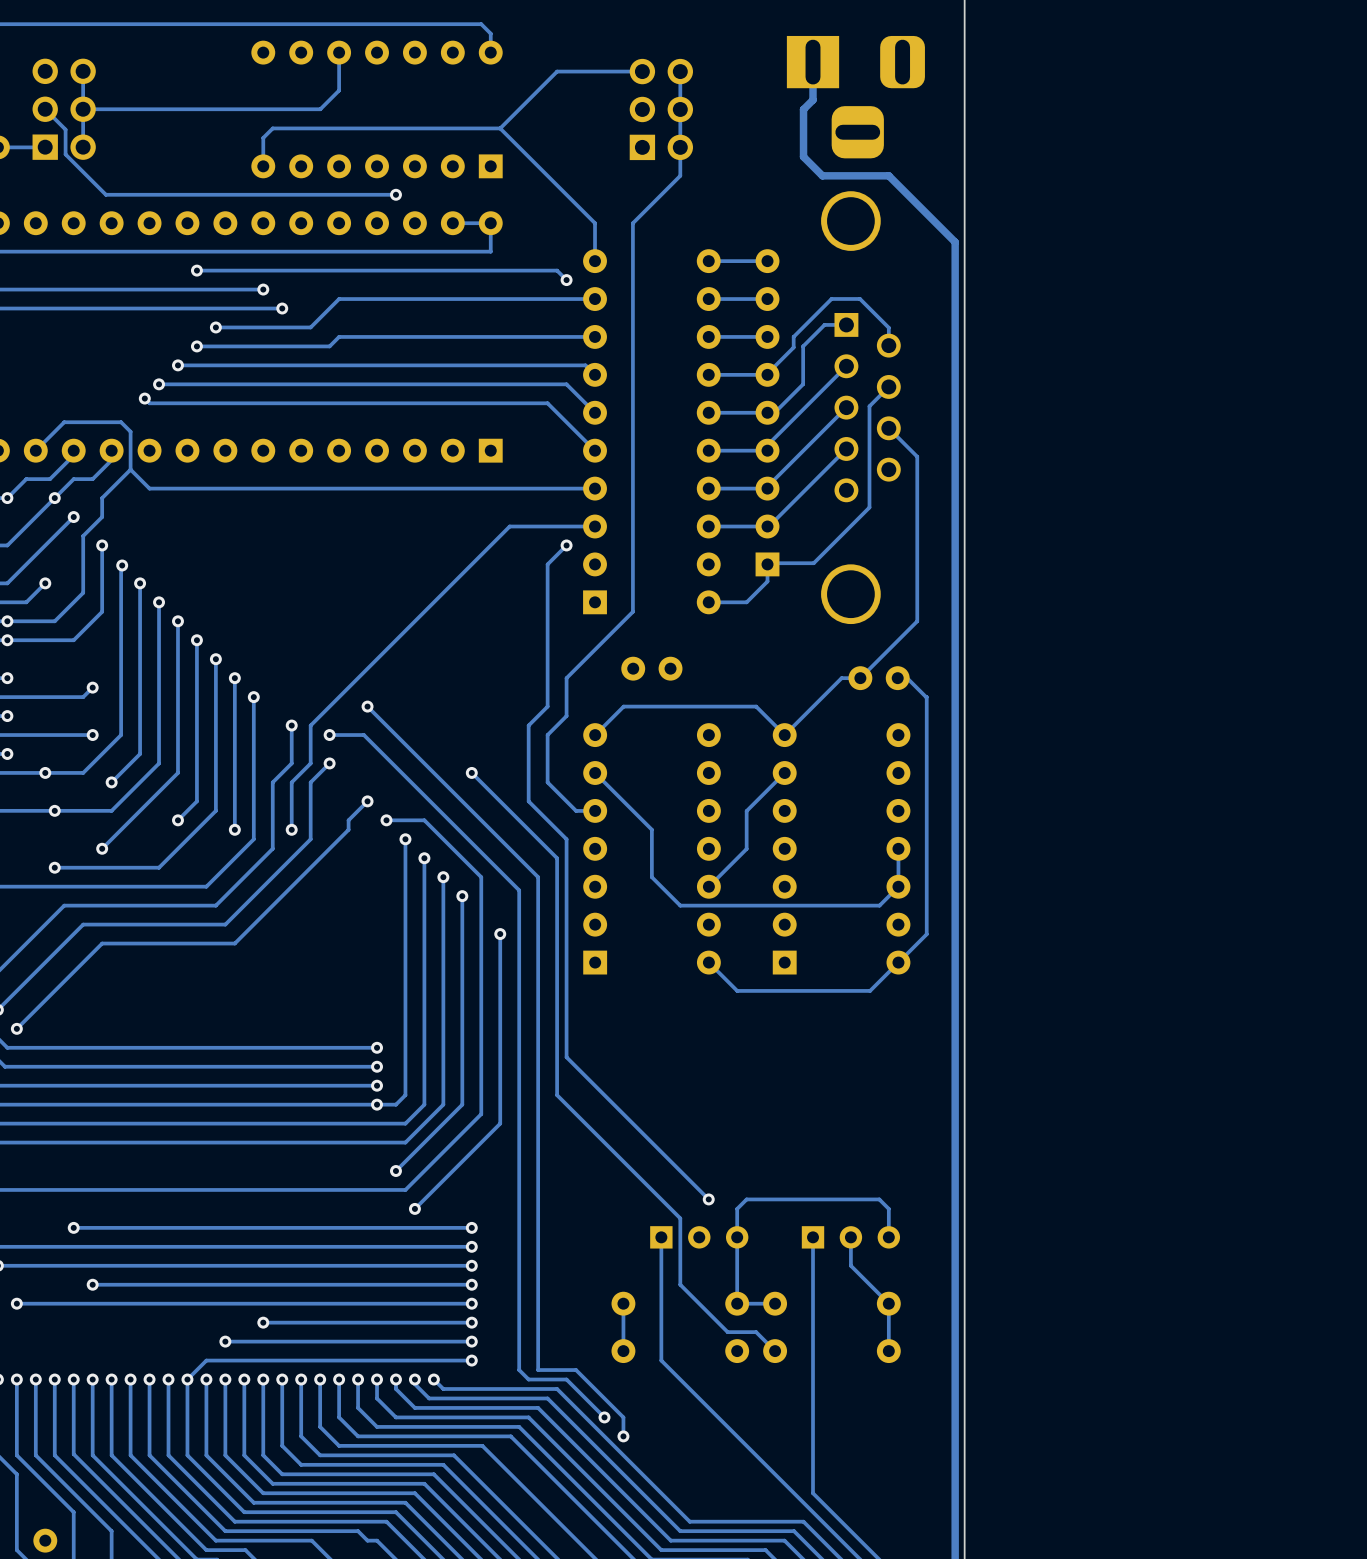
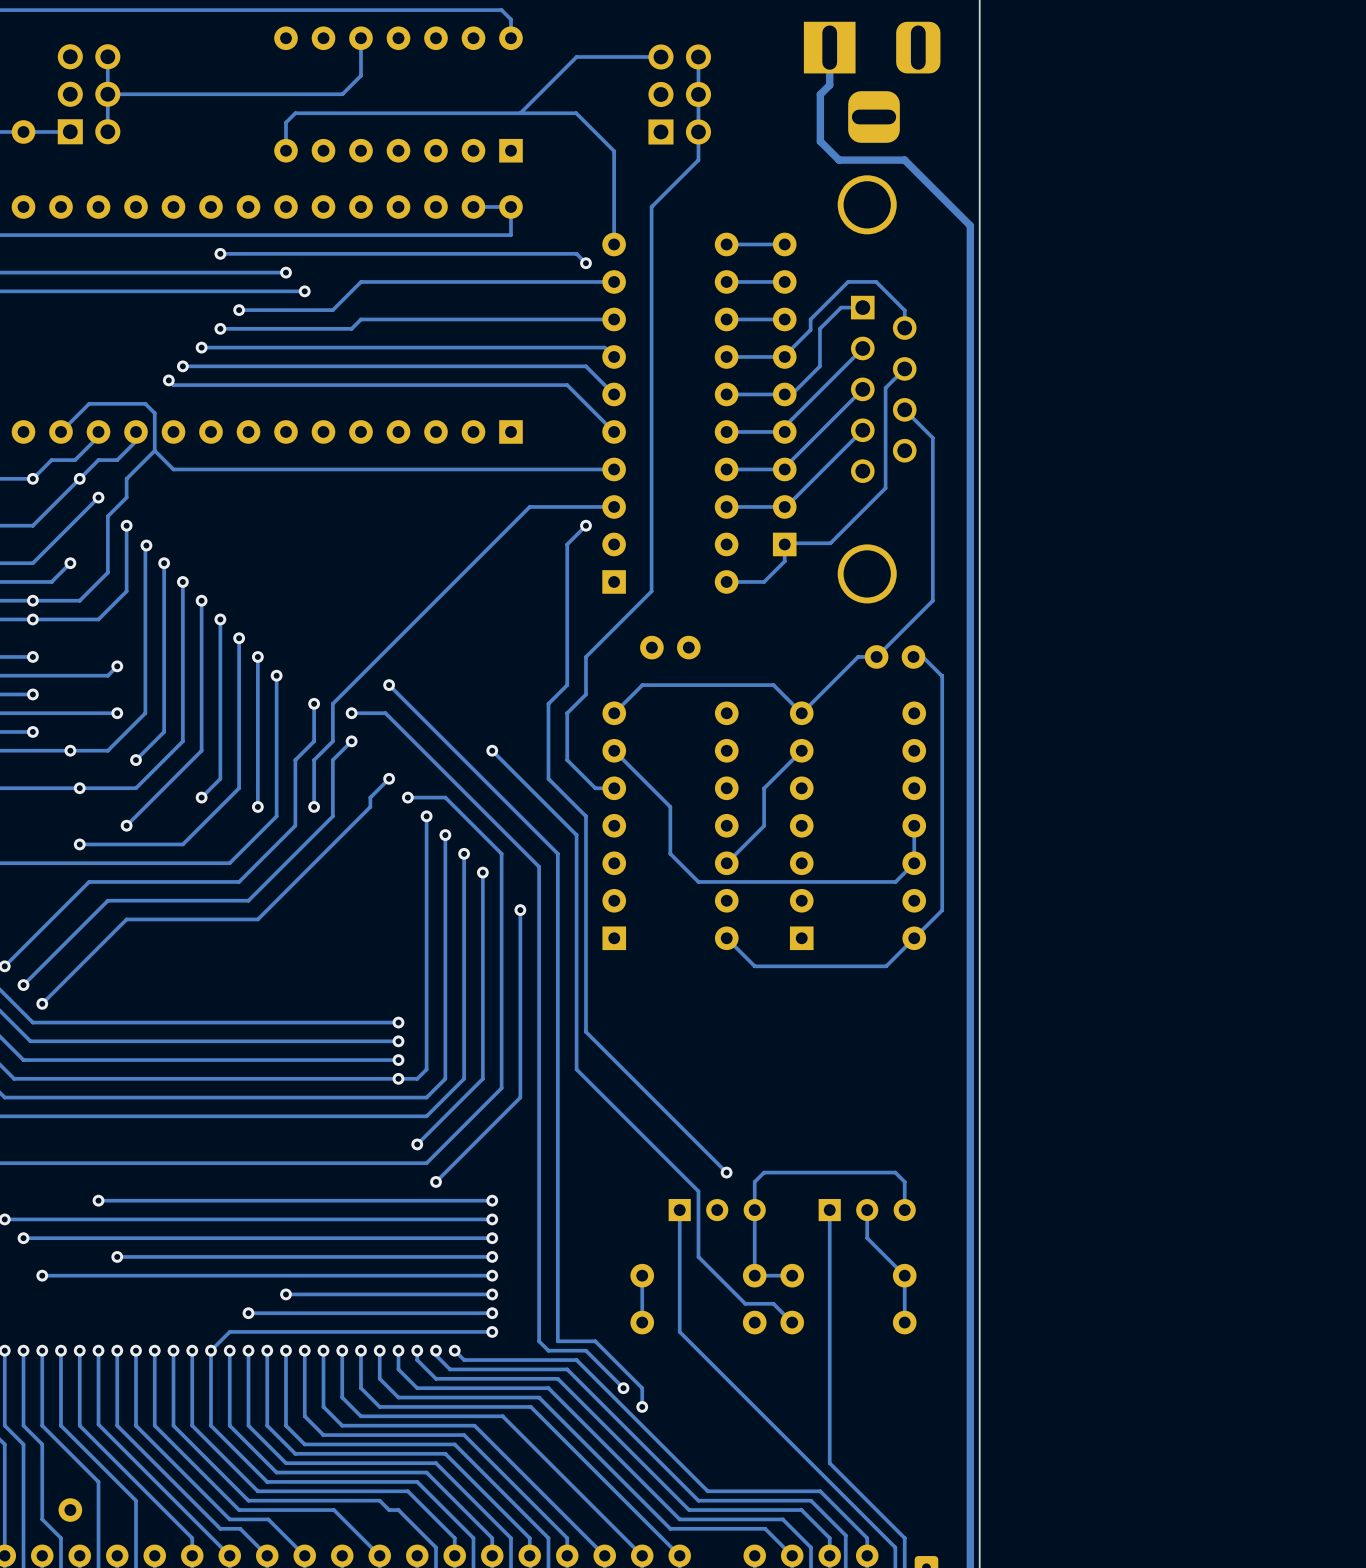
track: (45, 109) (65, 129) (65, 154) (105, 194) (395, 194) -> none
track: (500, 128) (595, 223) -> (520, 113) (576, 113) (614, 151) (614, 206)
via: (395, 194) -> none

